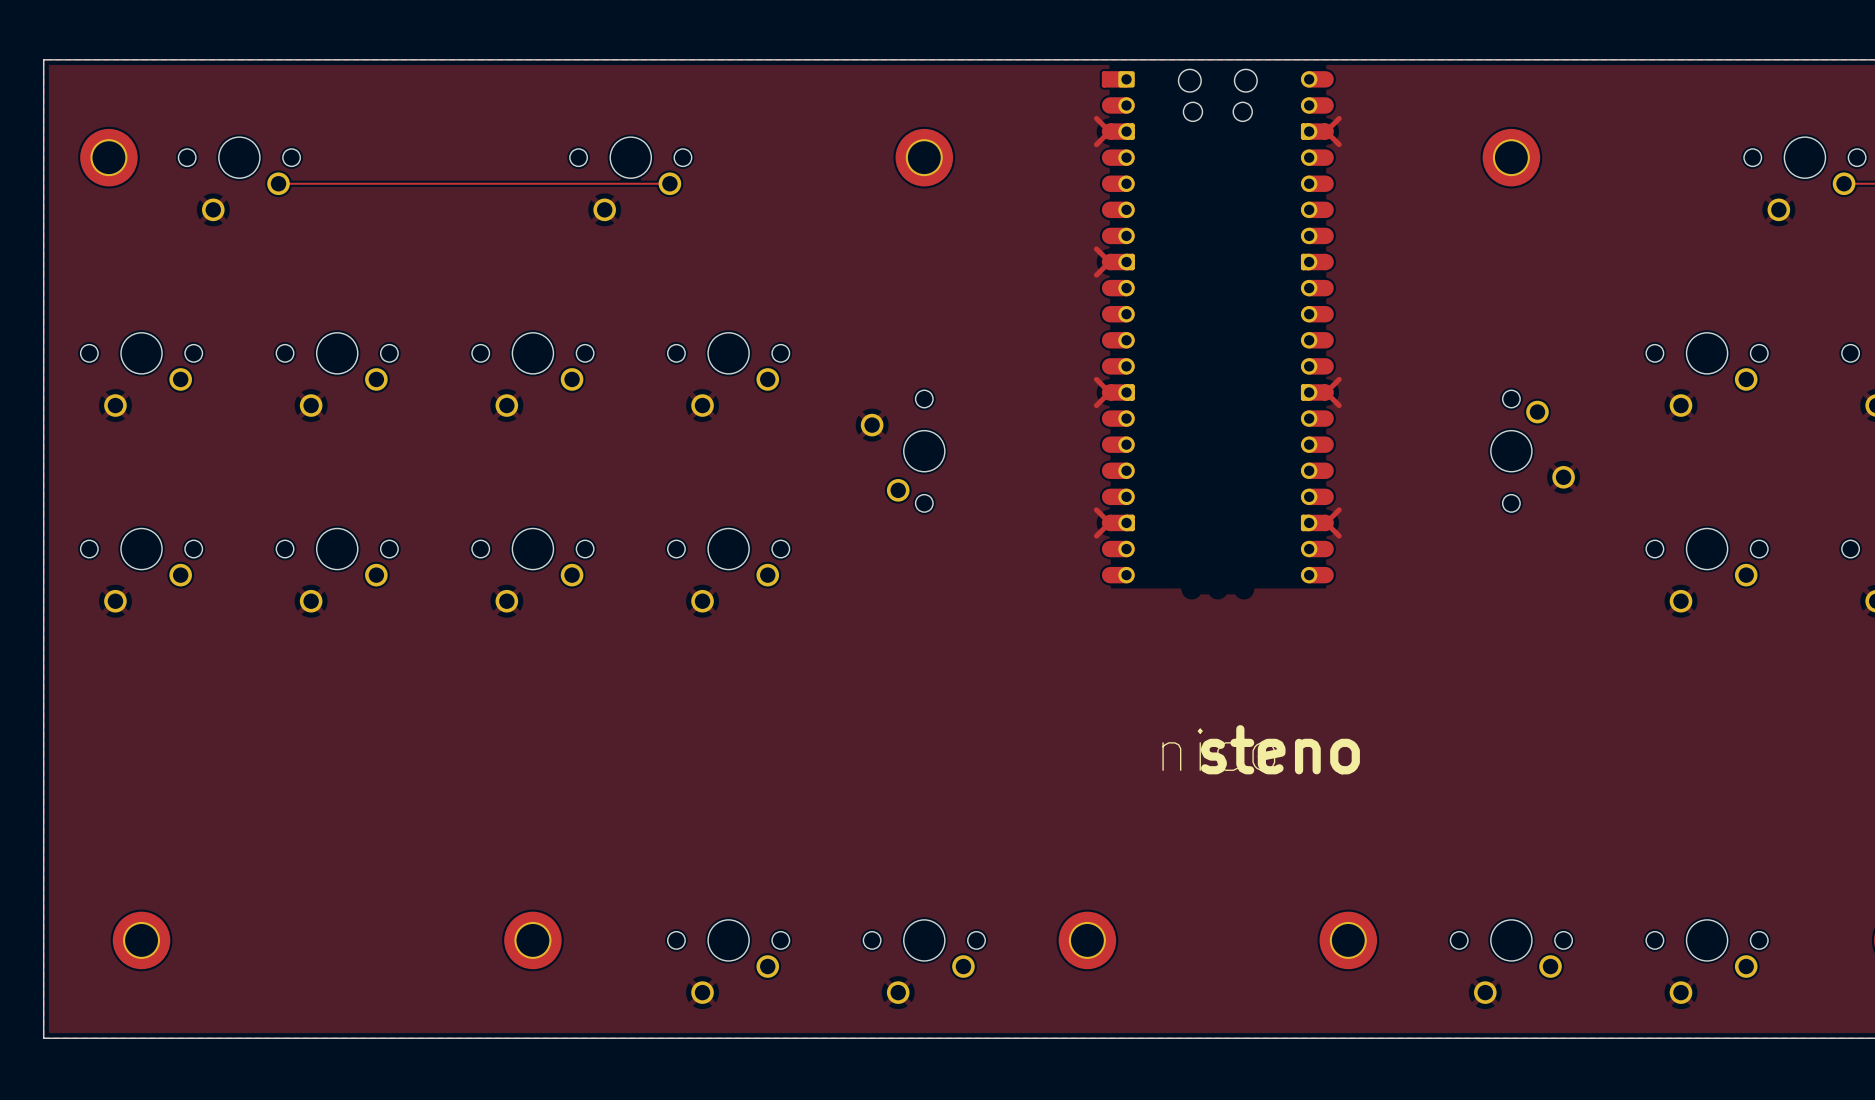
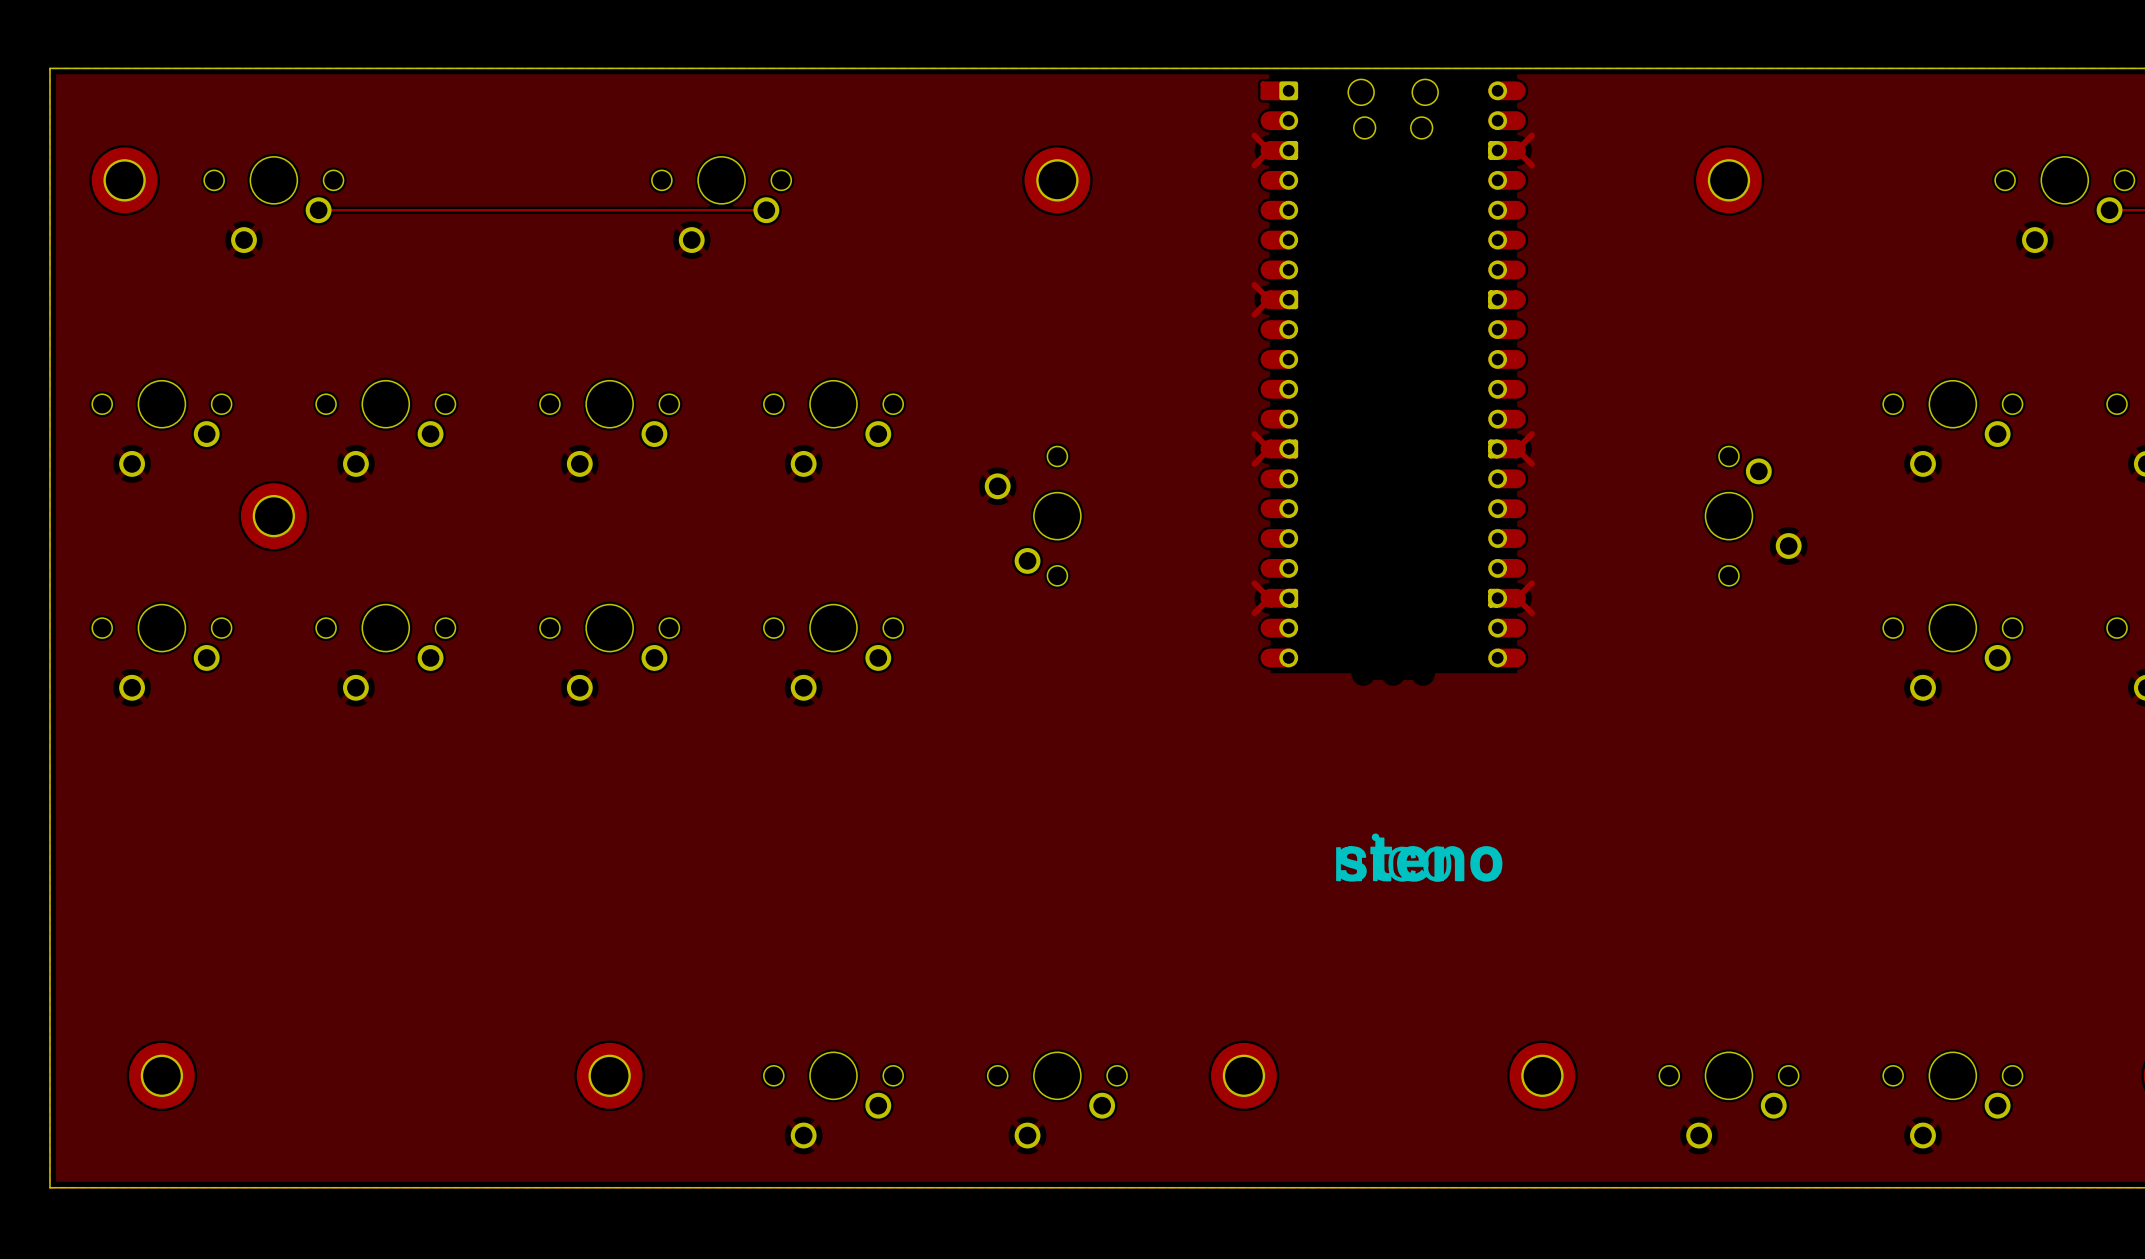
part: none -> (273, 516)

